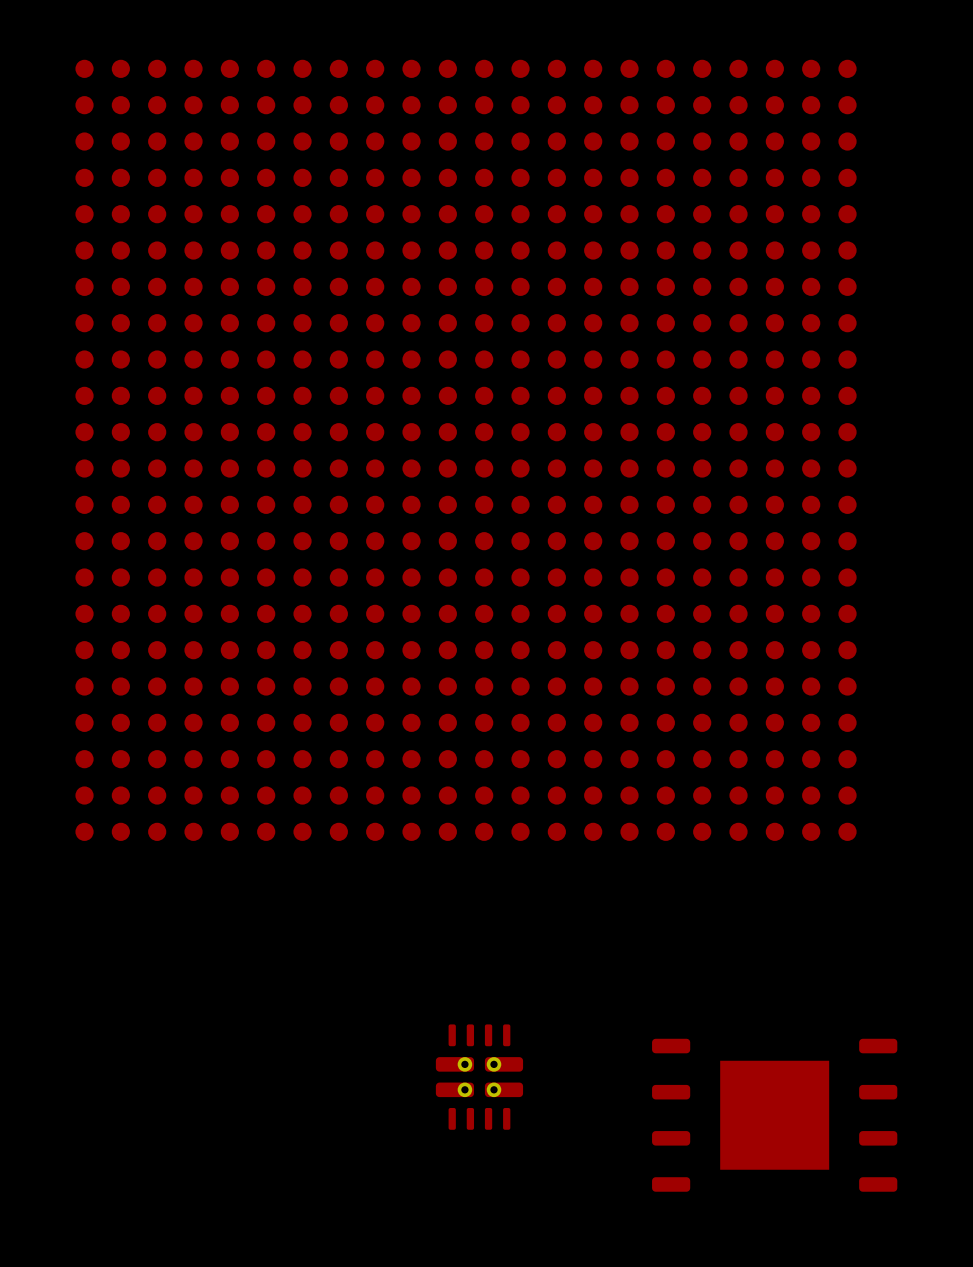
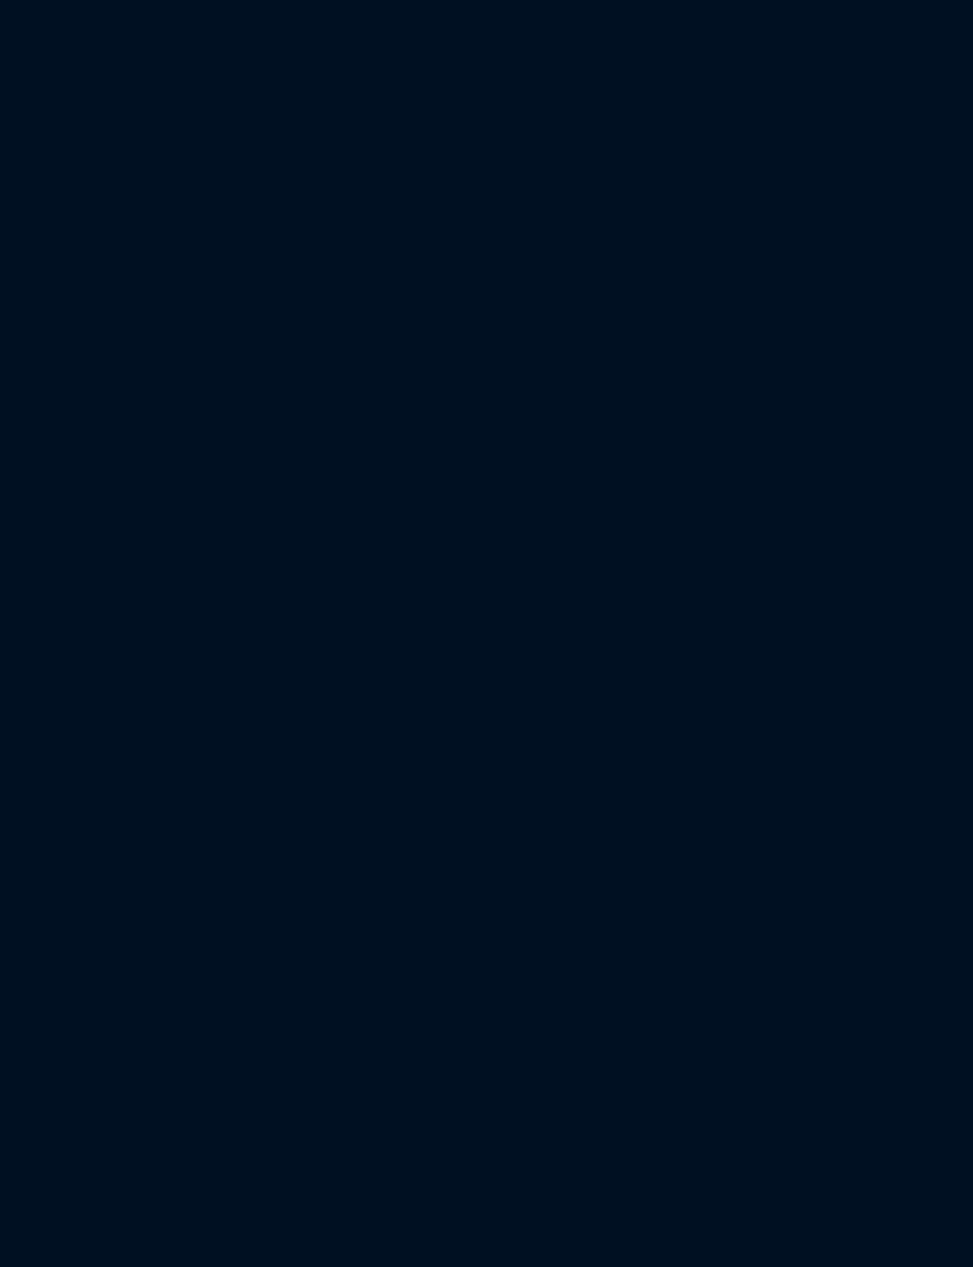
part: (466, 450) -> none
part: (479, 1077) -> none
part: (774, 1115) -> none

